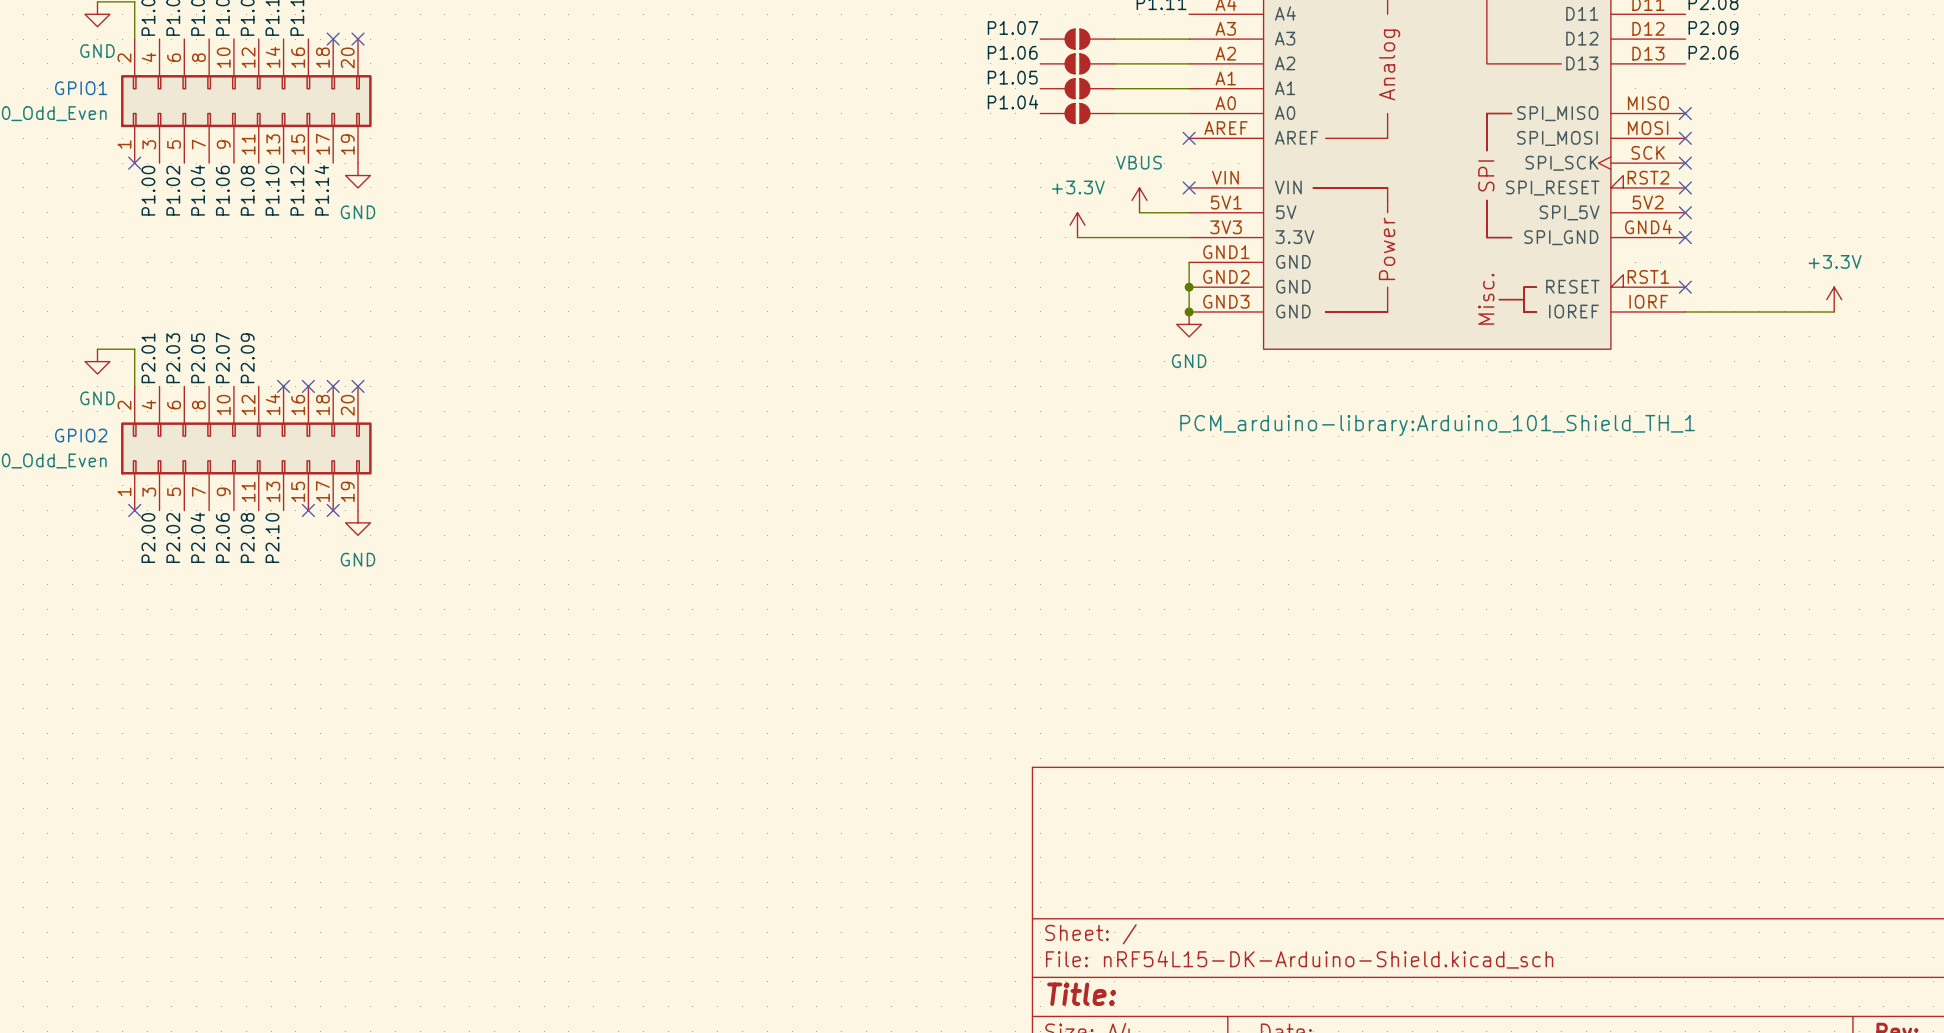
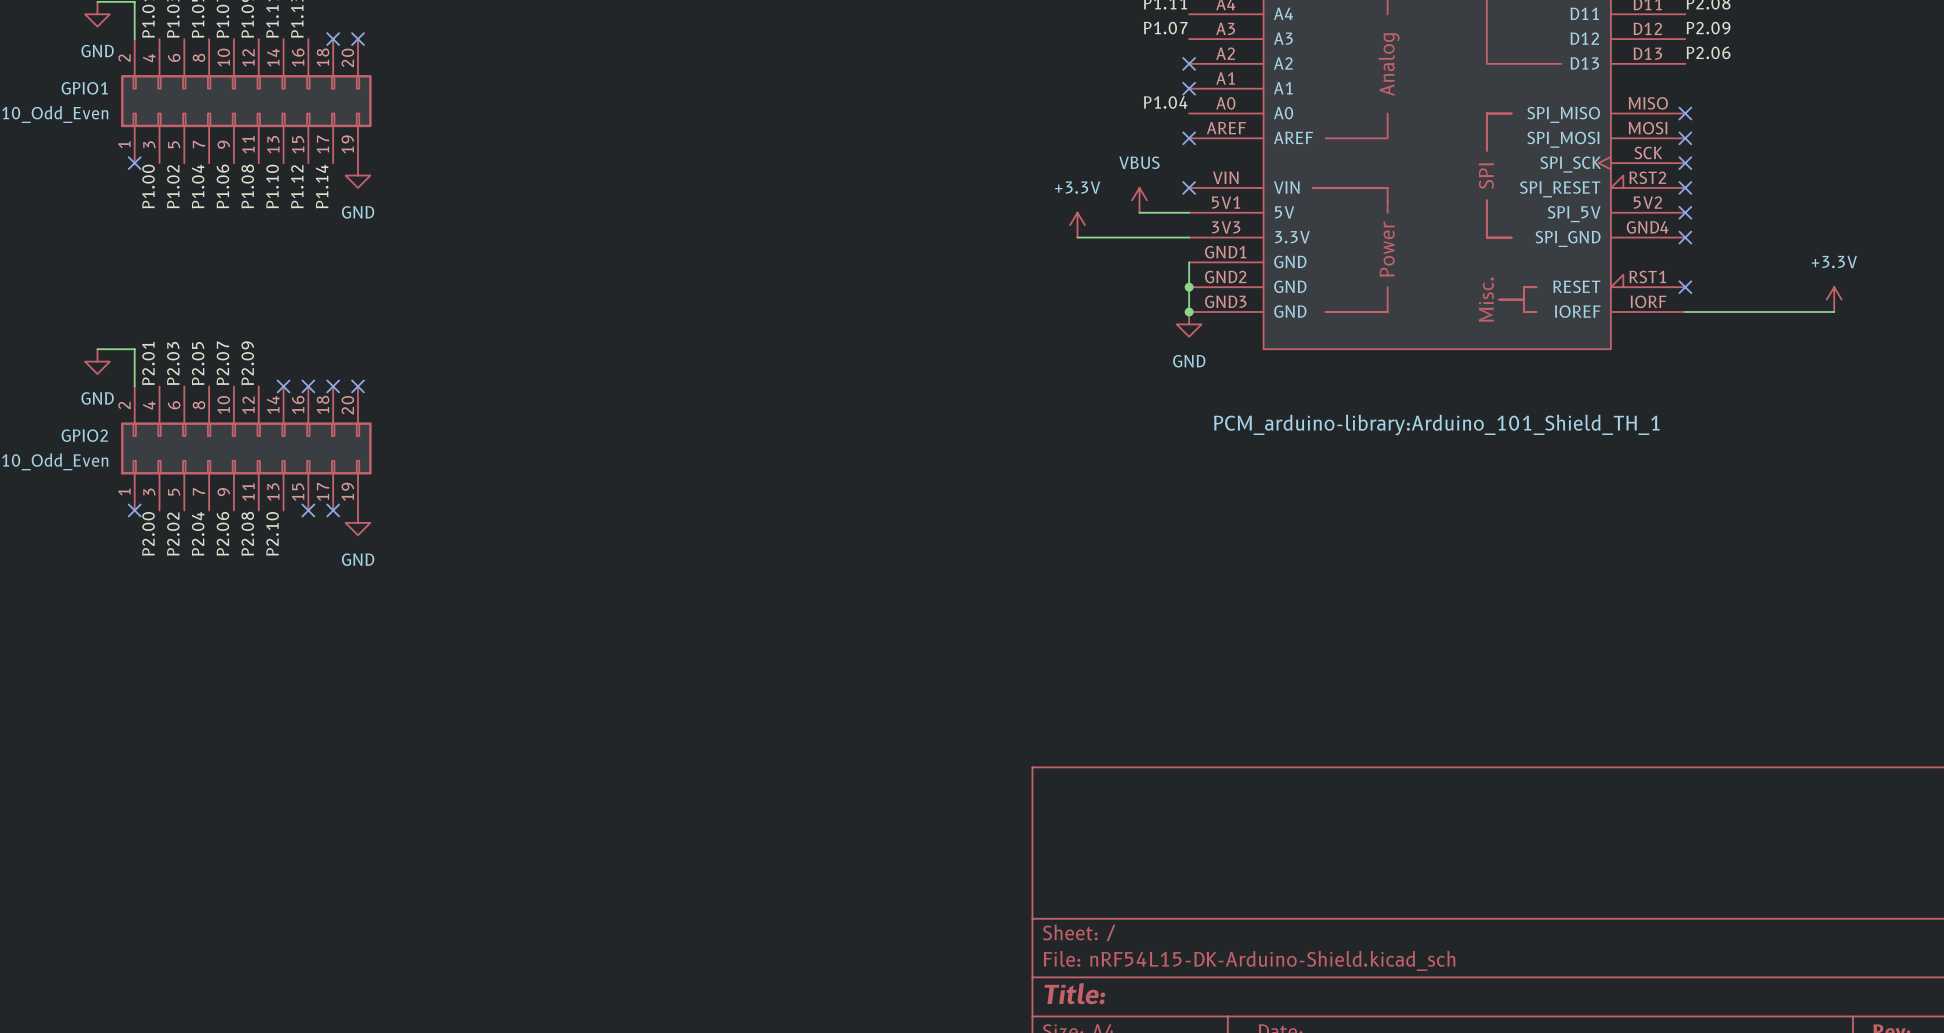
label position: P1.07 (1013, 28) -> P1.07 (1165, 28)
part: (1077, 39) -> none
wire: (1114, 39) (1189, 39) -> none
label: P1.06 (1012, 52) -> none
part: (1077, 63) -> none
wire: (1114, 63) (1189, 63) -> none
no-connect mark: none -> (1189, 63)
label: P1.05 (1012, 77) -> none
part: (1077, 88) -> none
wire: (1114, 88) (1189, 88) -> none
no-connect mark: none -> (1189, 88)
label position: P1.04 (1013, 102) -> P1.04 (1165, 102)
part: (1077, 113) -> none
wire: (1114, 113) (1189, 113) -> none

